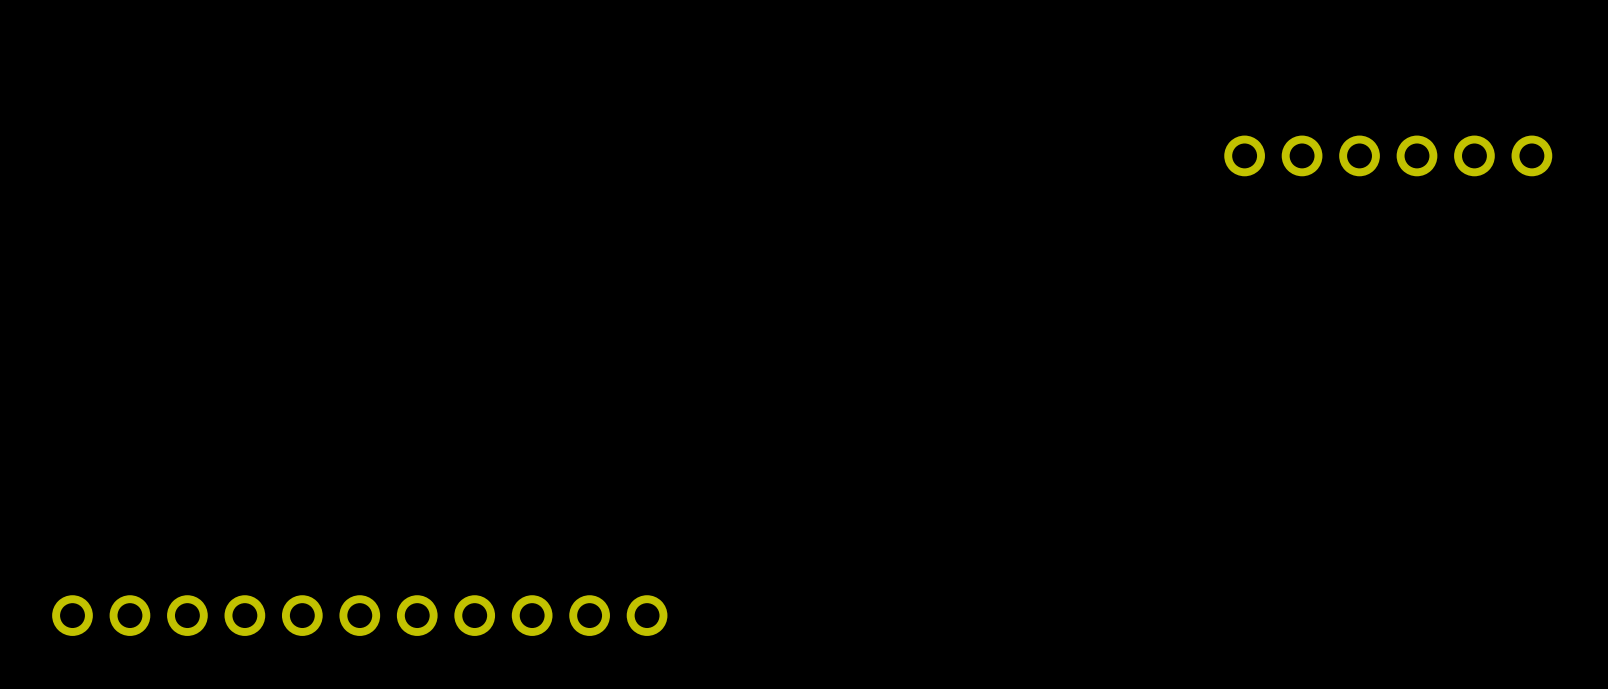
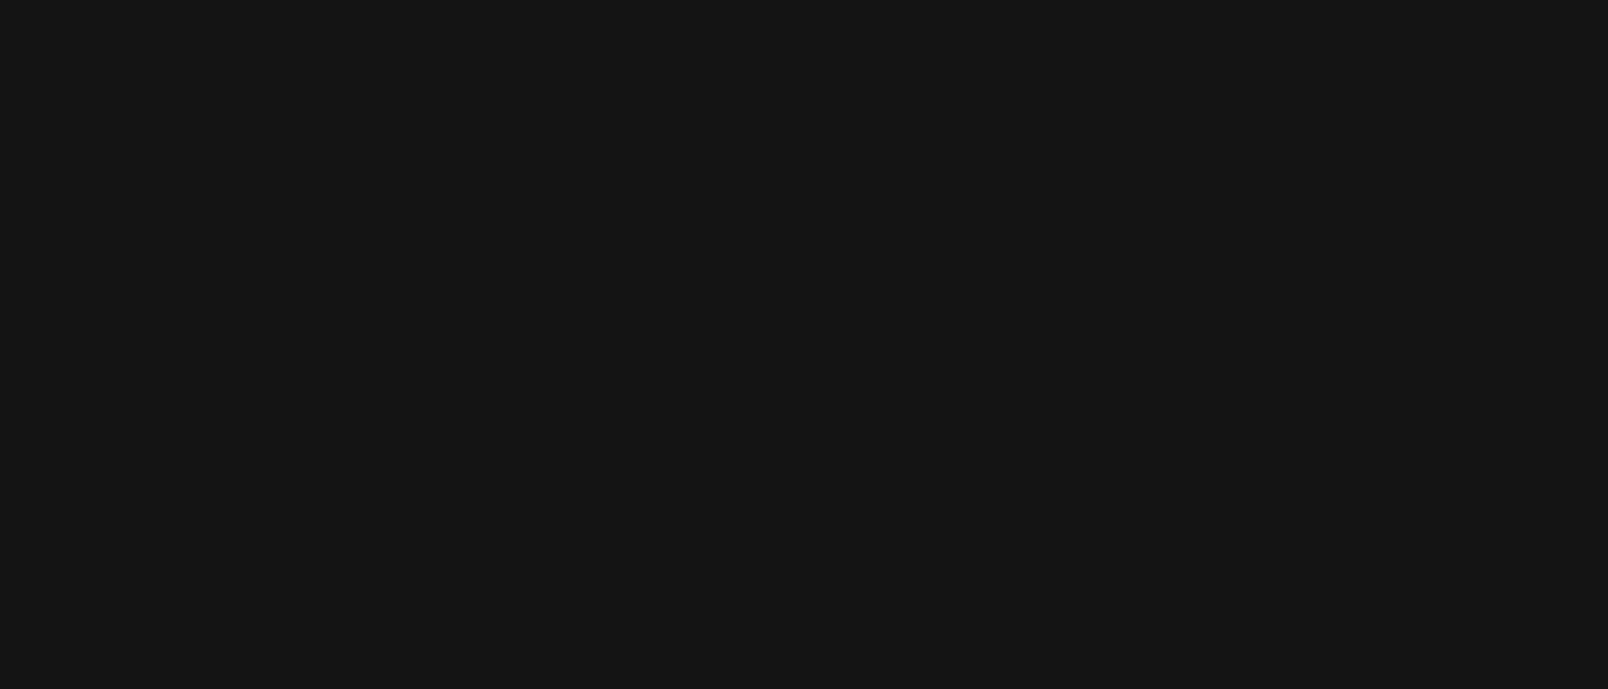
part: (1388, 155) -> none
part: (359, 615) -> none

